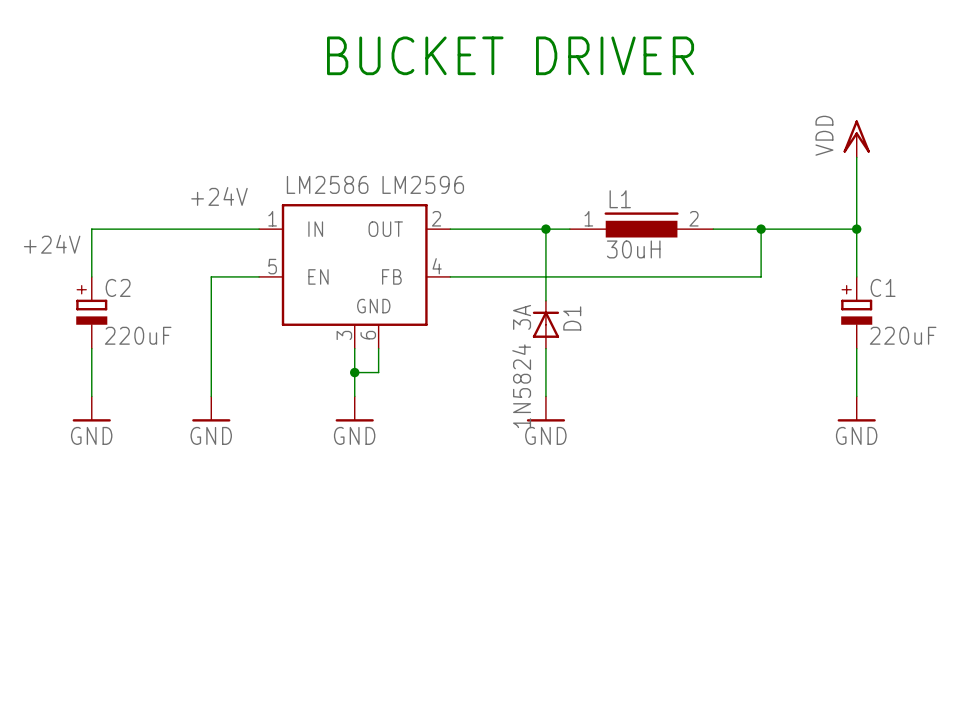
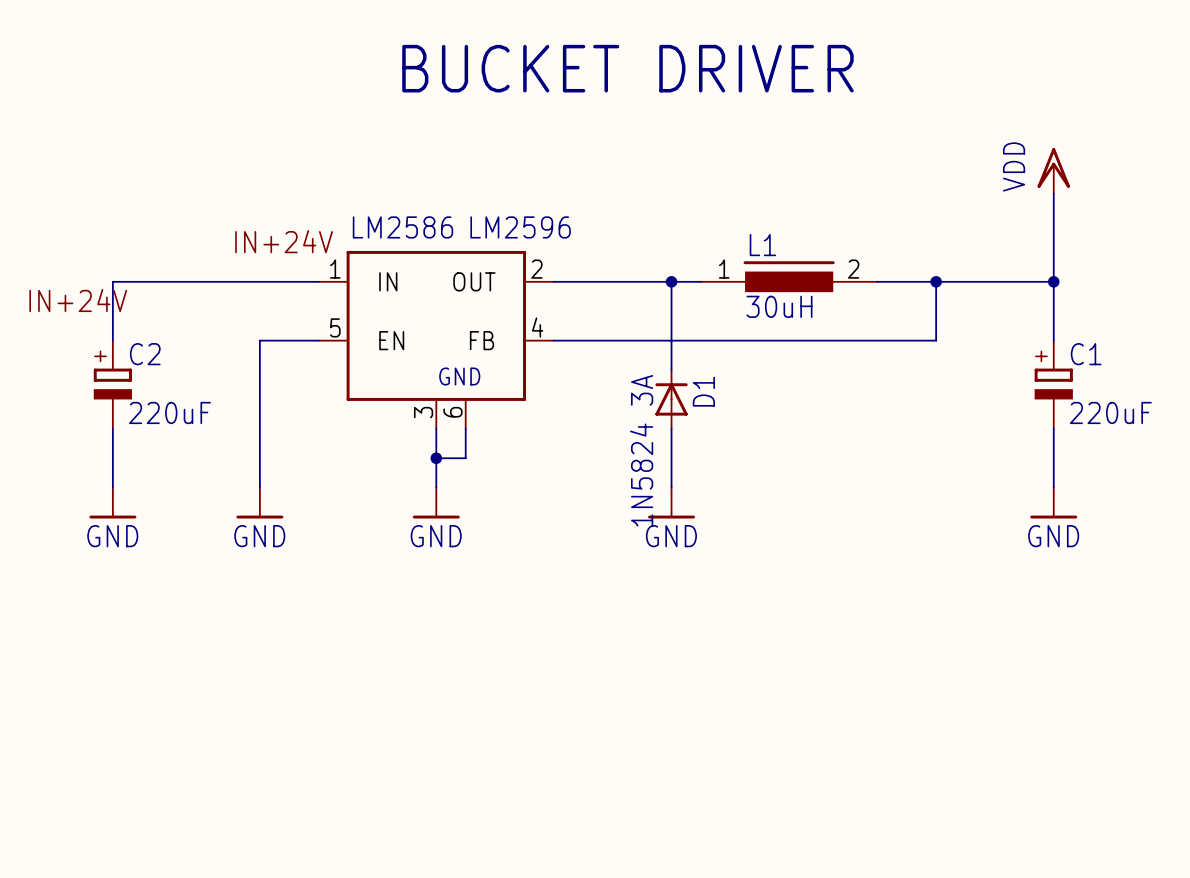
label: +24V (219, 196) -> IN+24V (284, 241)
label: +24V (52, 244) -> IN+24V (78, 300)

